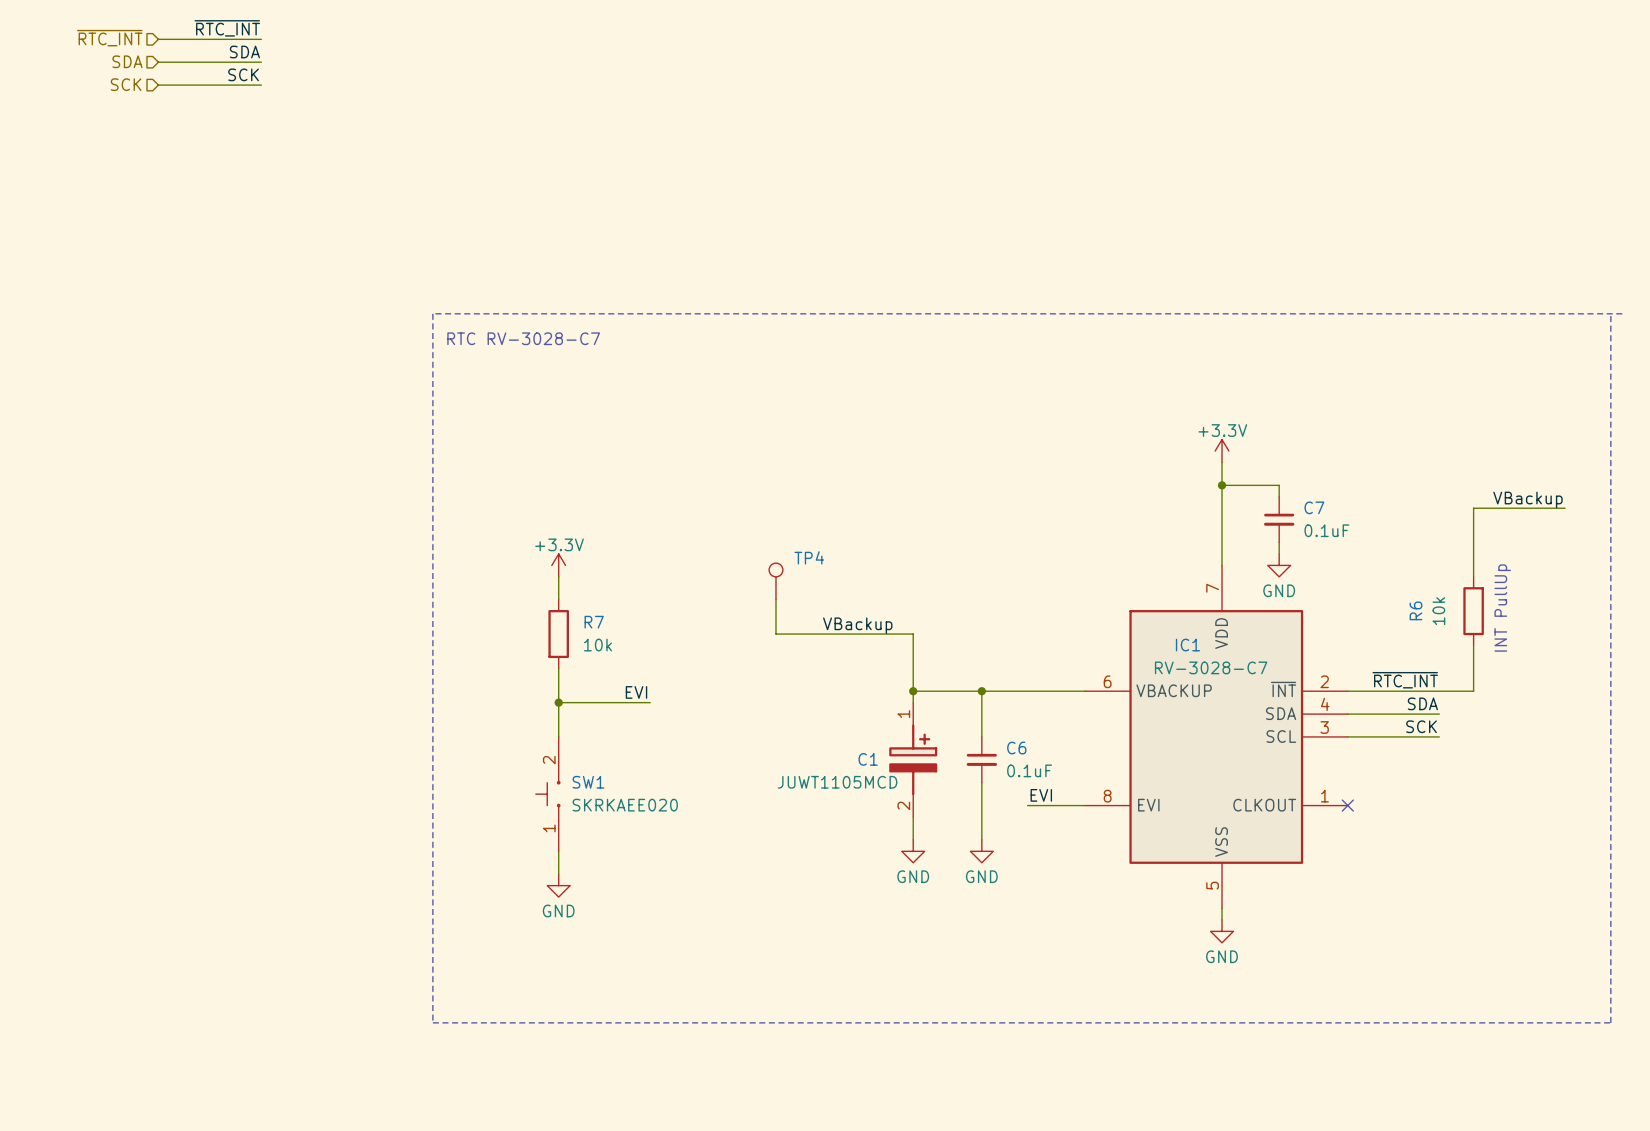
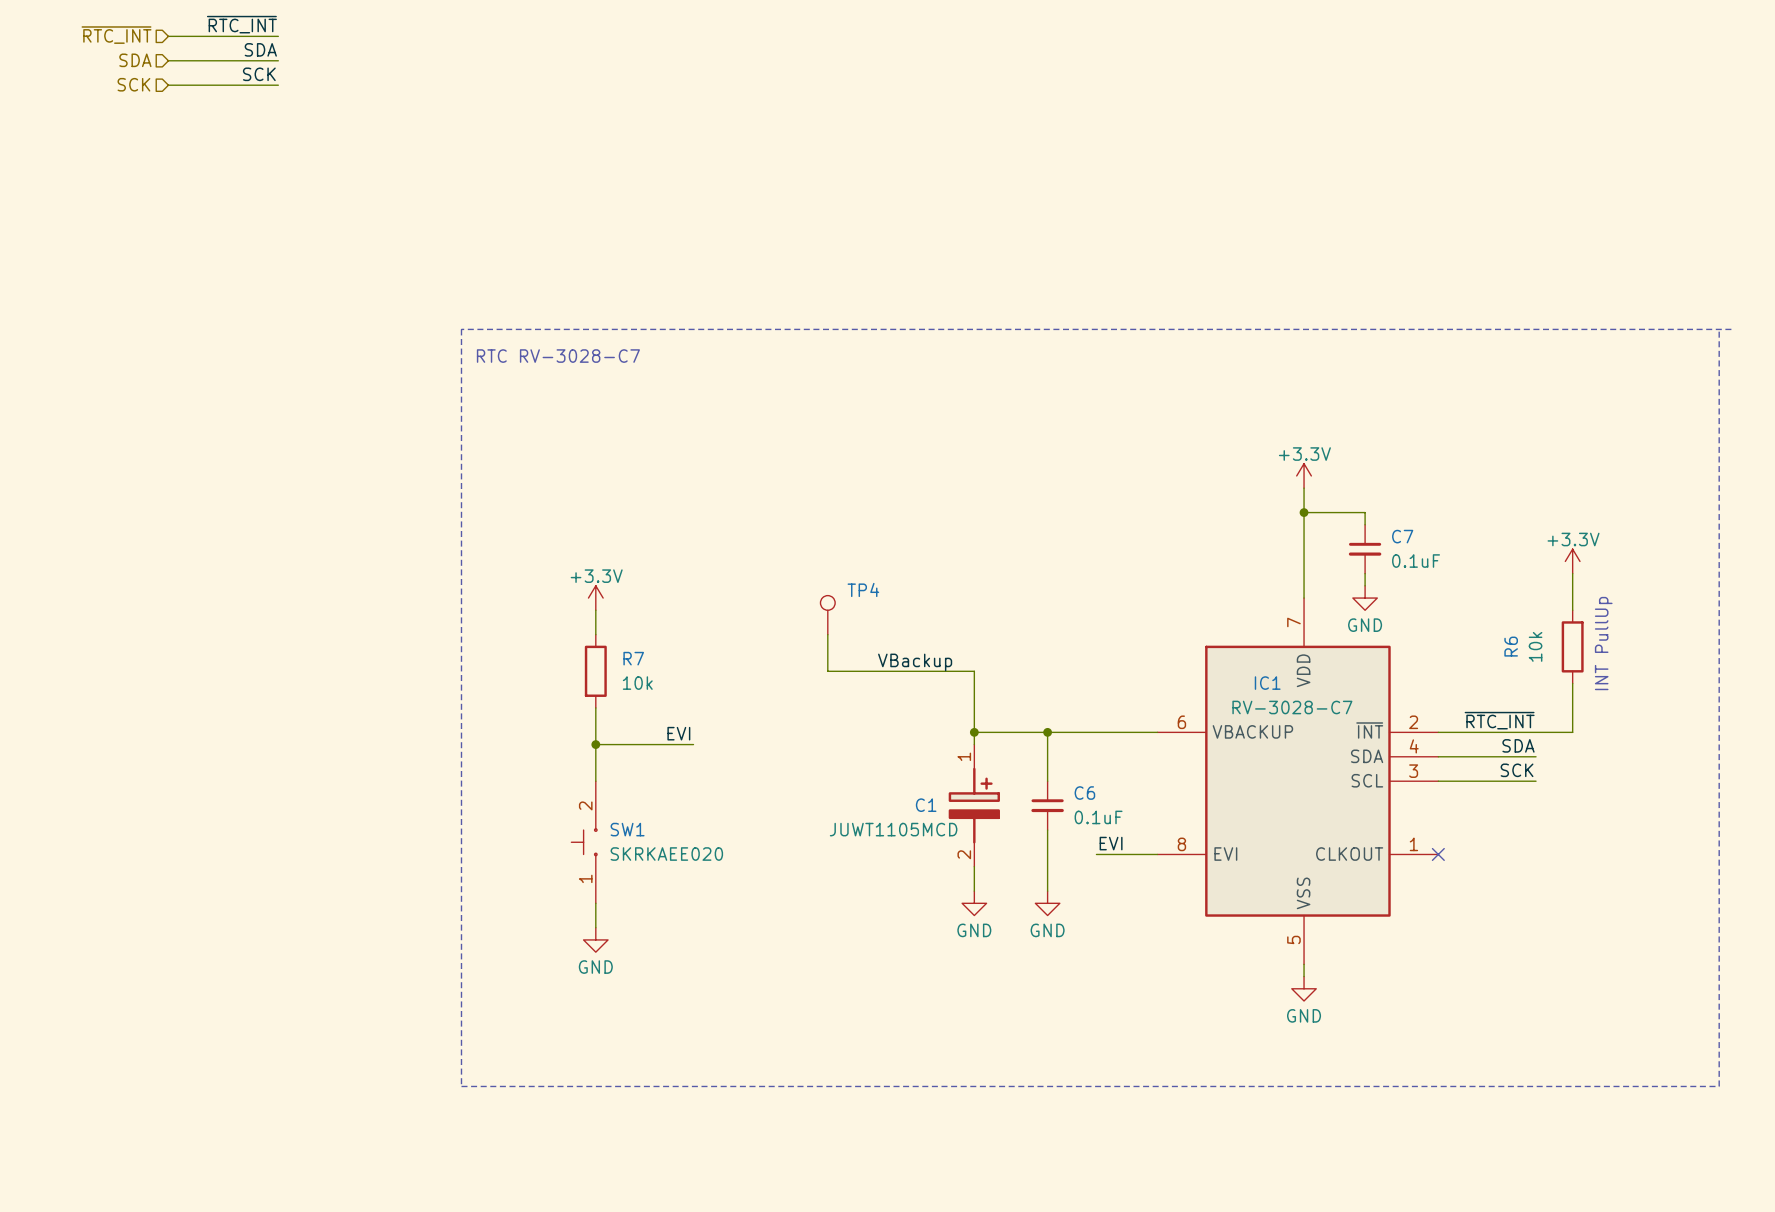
label: VBackup (1527, 499) -> none
wire: (1565, 508) (1473, 508) (1473, 542) -> none
power symbol: none -> +3.3V (1572, 561)

